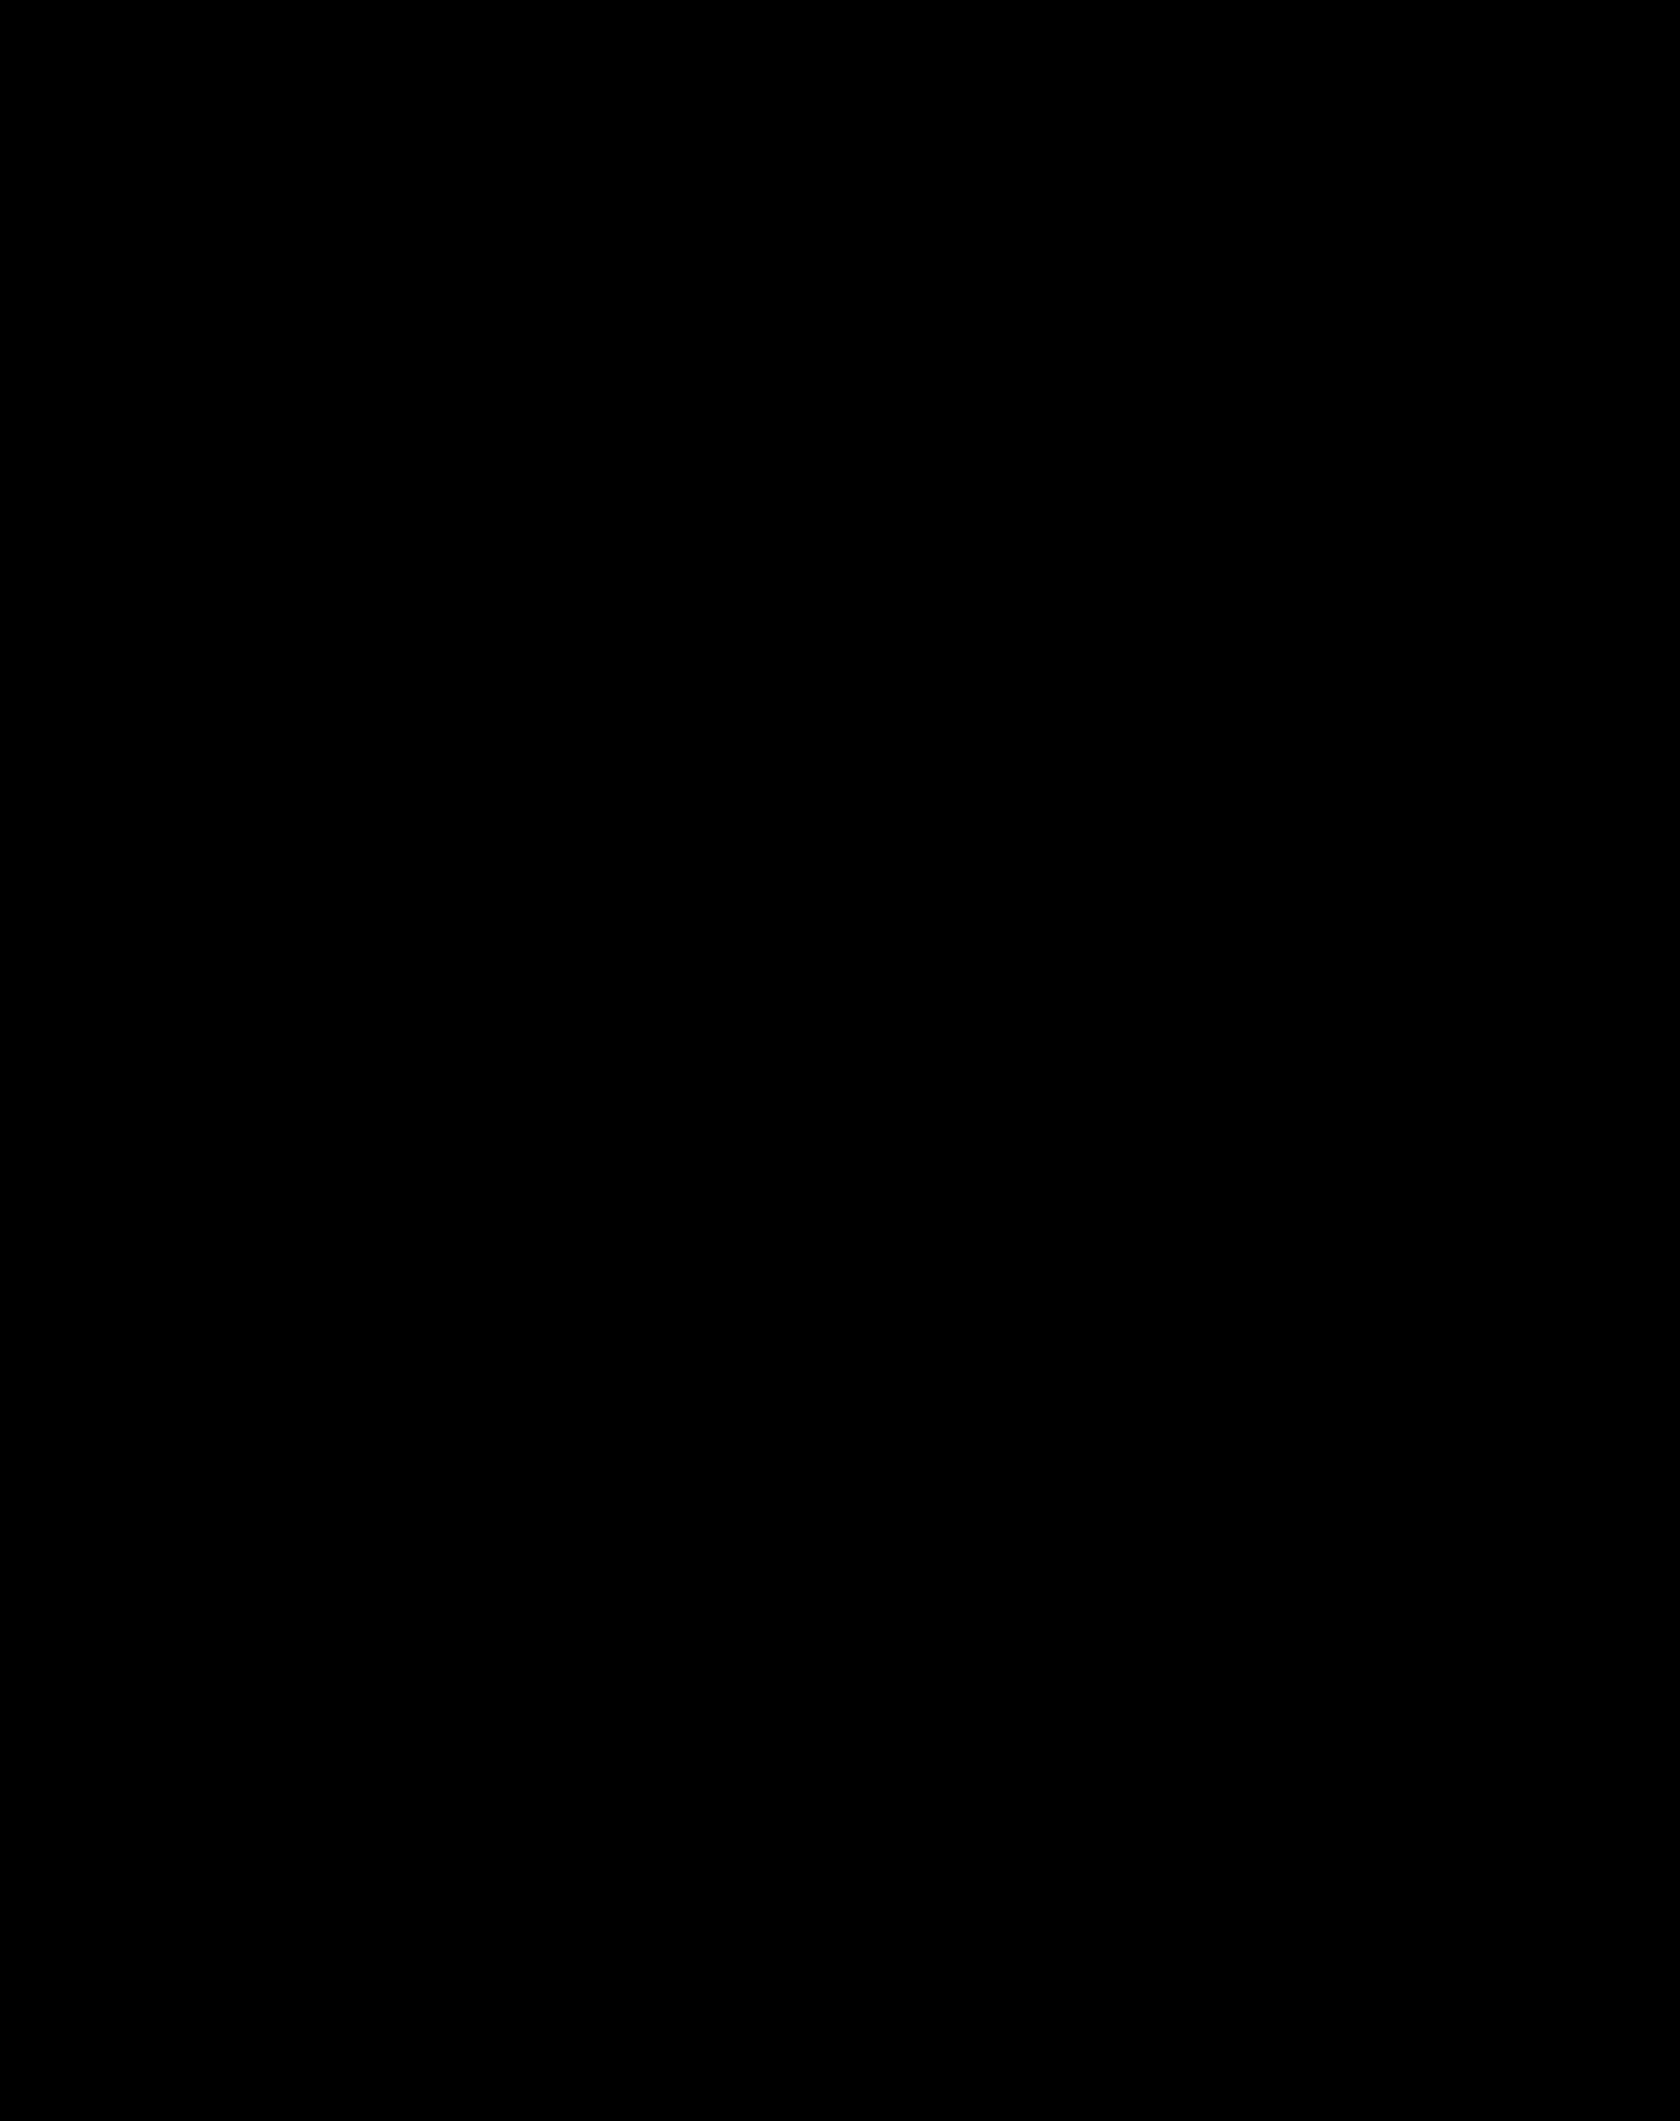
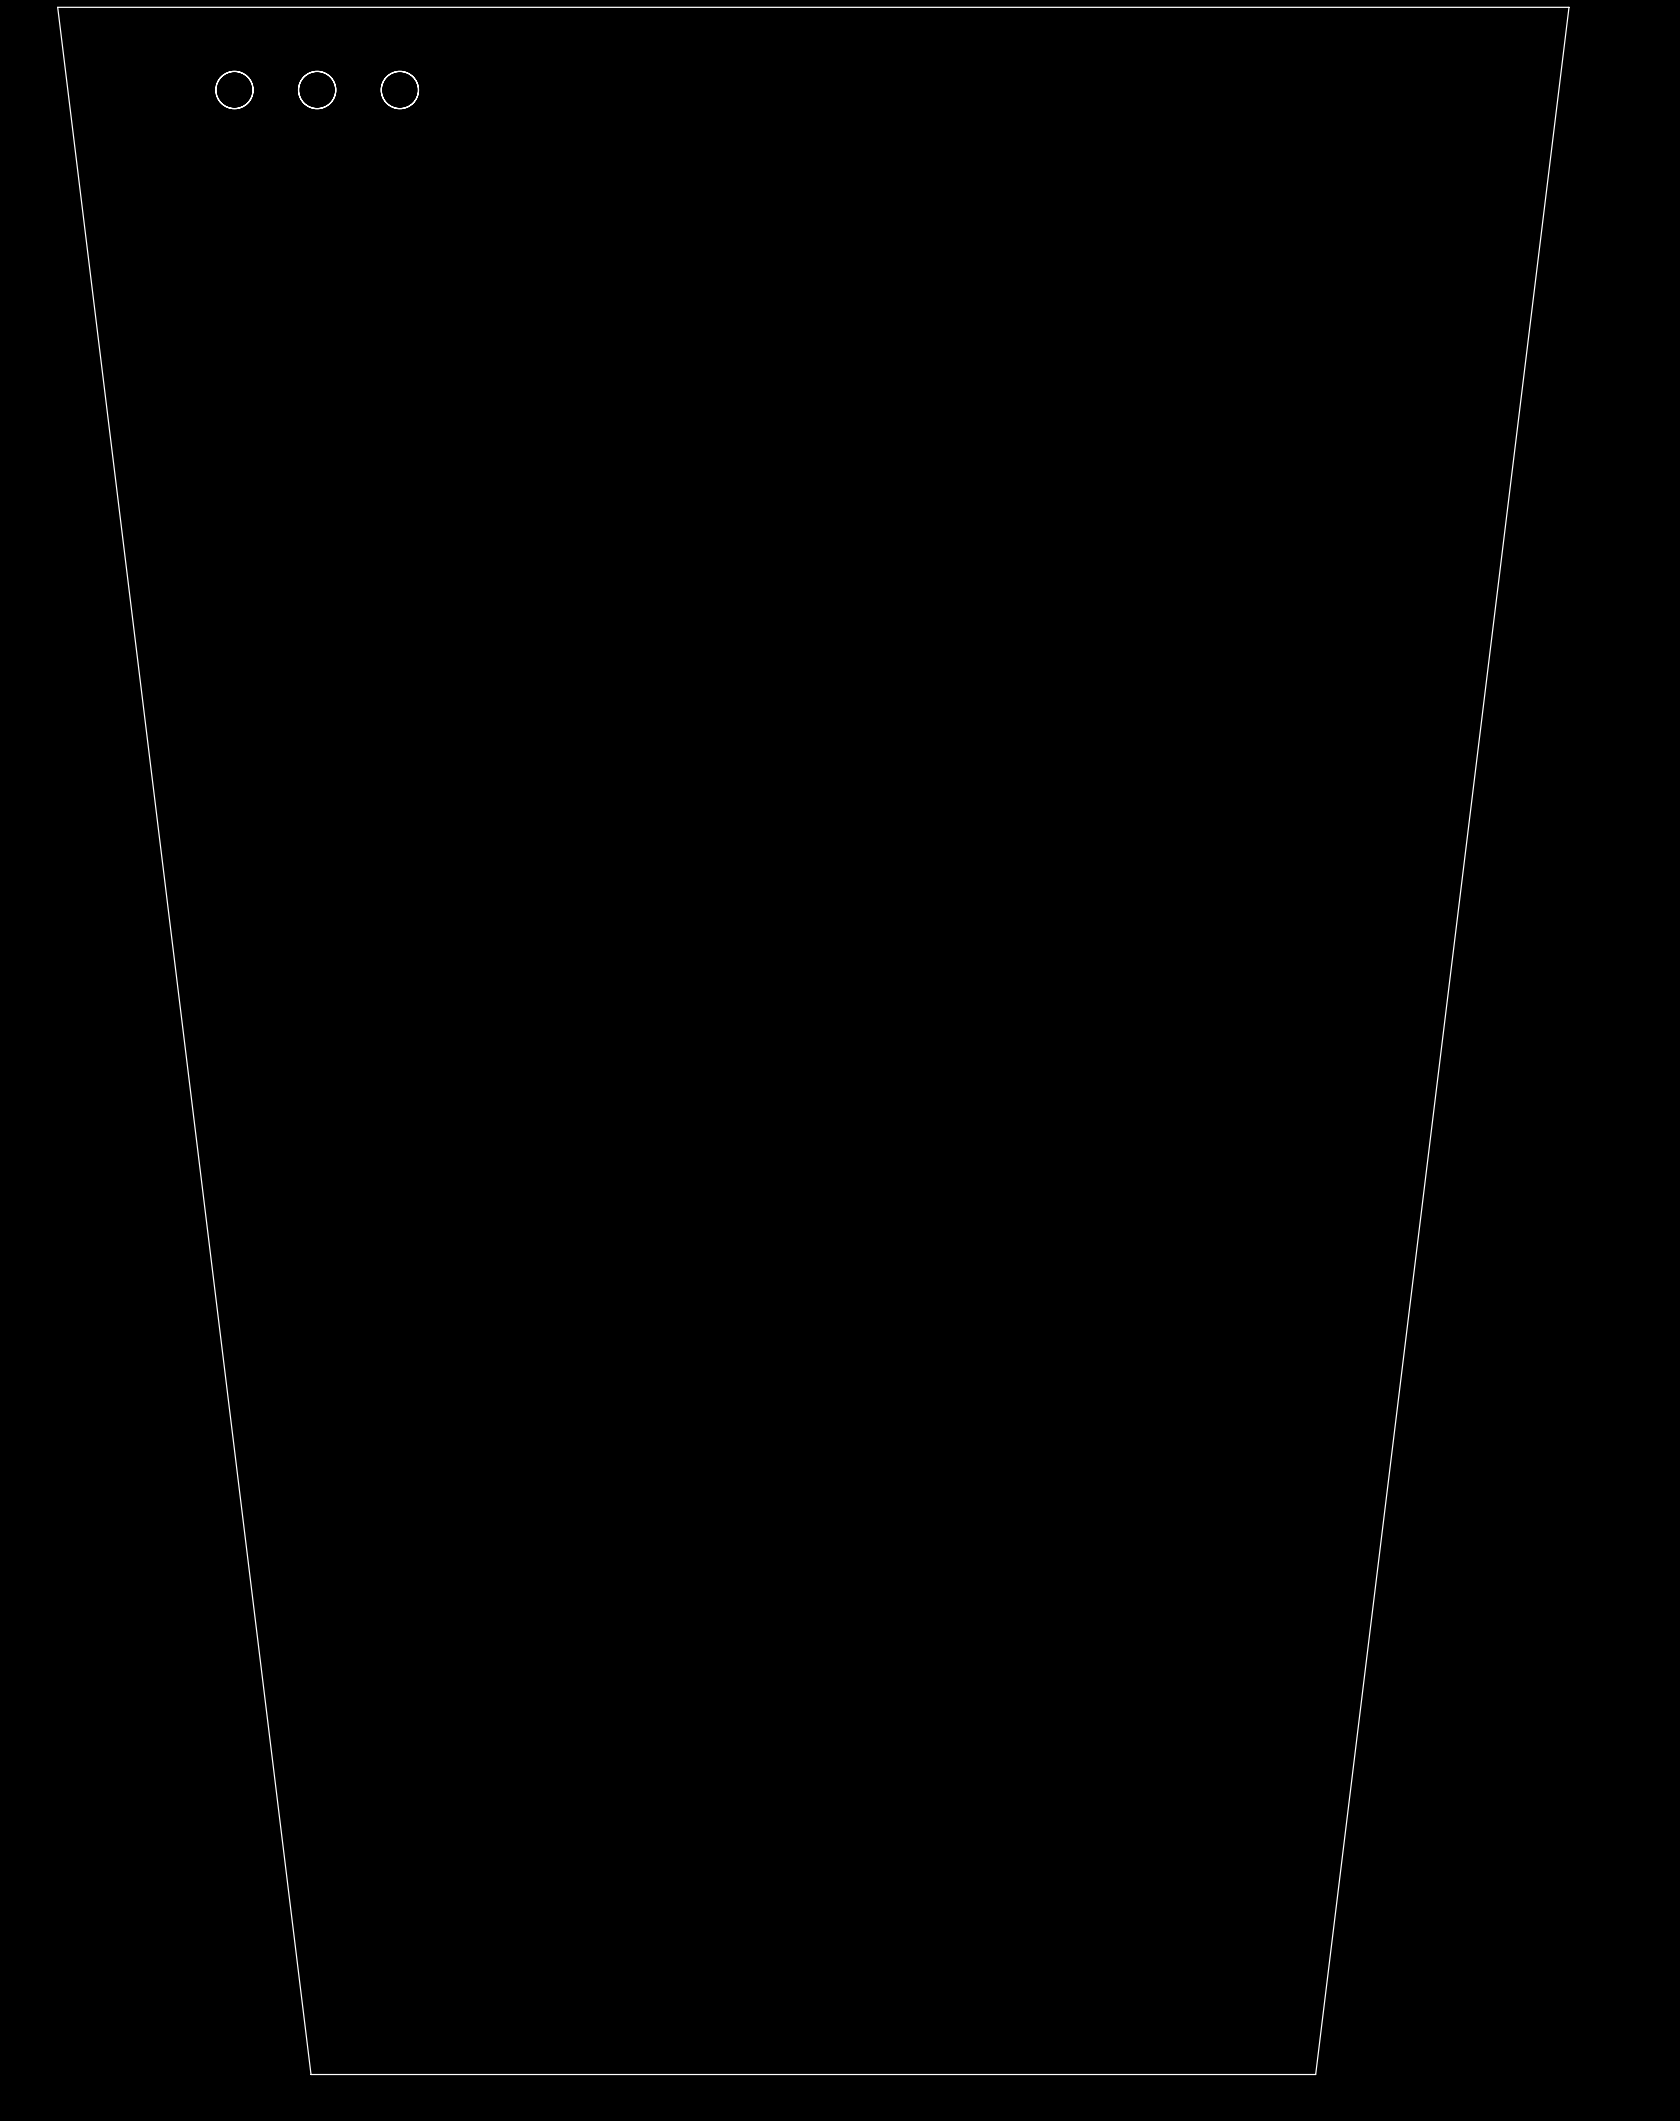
board edge: none -> (57, 7) (1568, 7) (1315, 2074) (311, 2074) (57, 7)
round board edge: none -> [215, 71, 254, 109]
round board edge: none -> [298, 71, 336, 109]
round board edge: none -> [381, 71, 419, 109]

